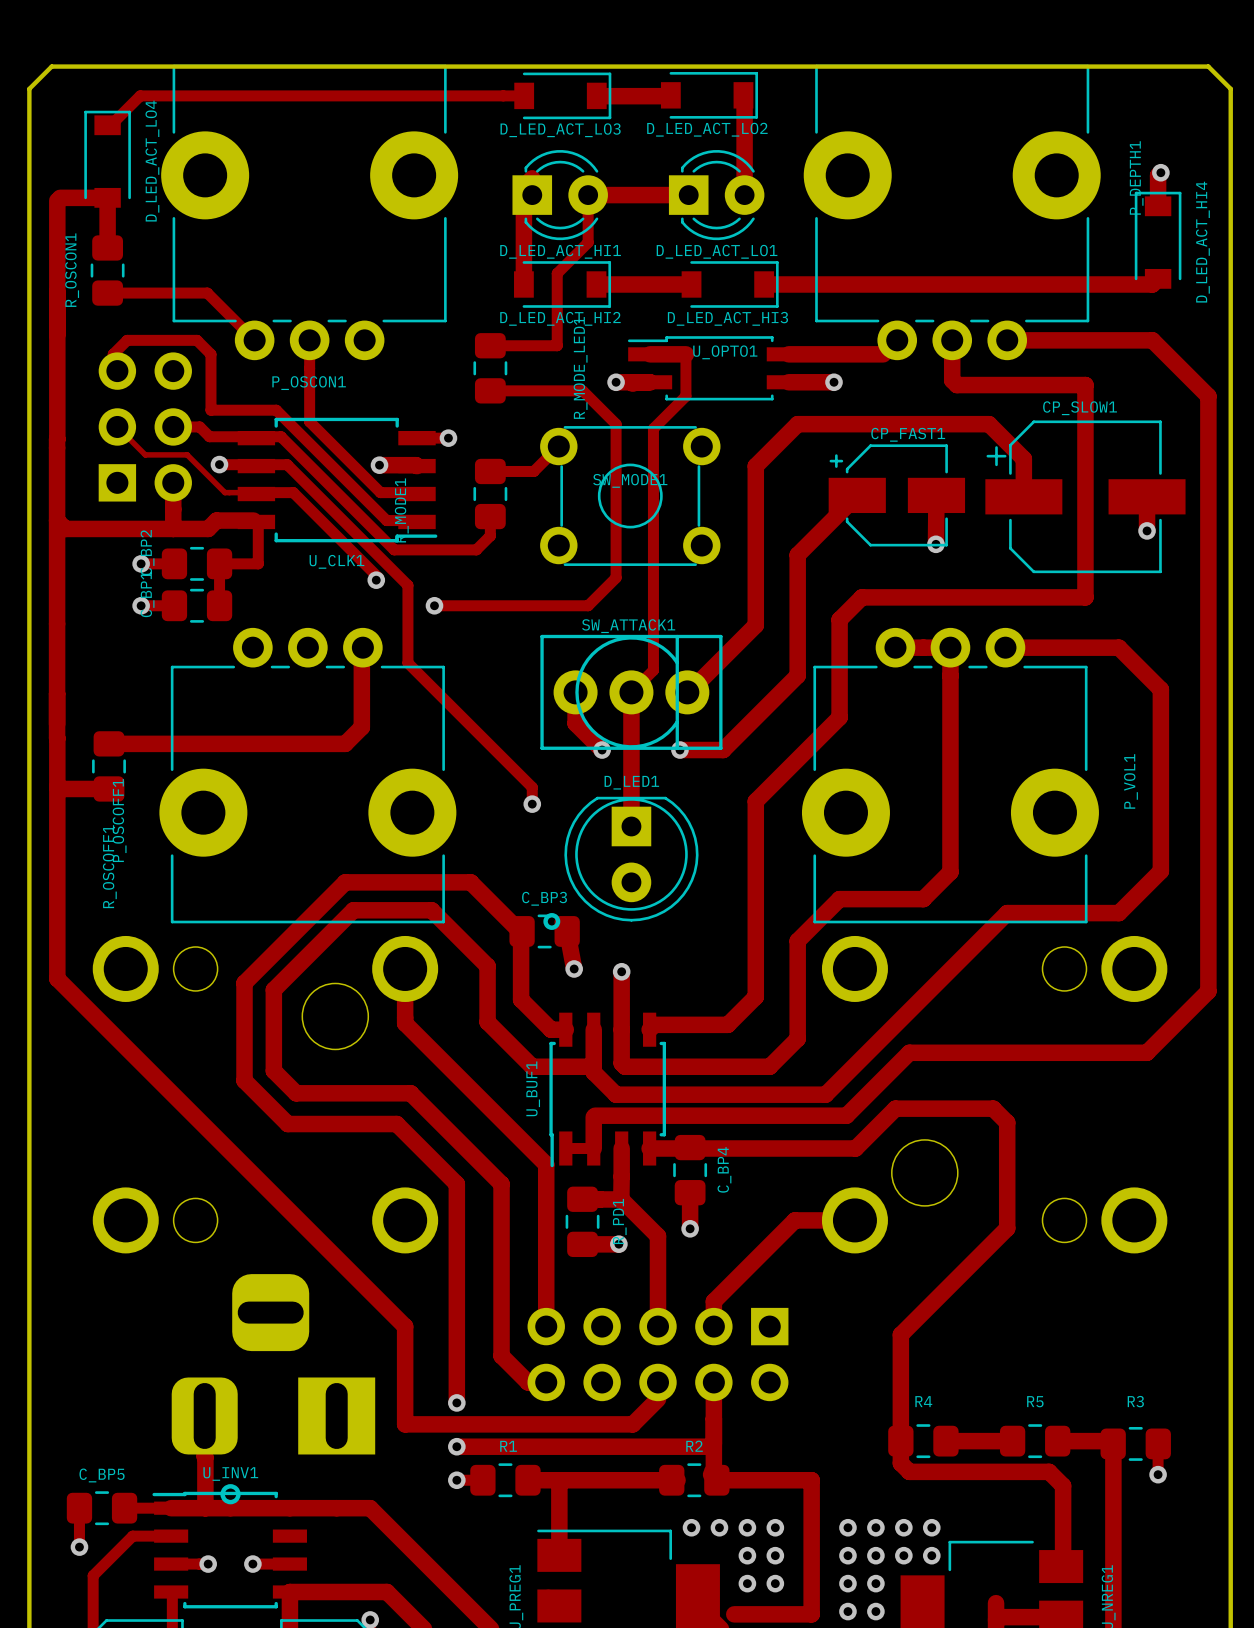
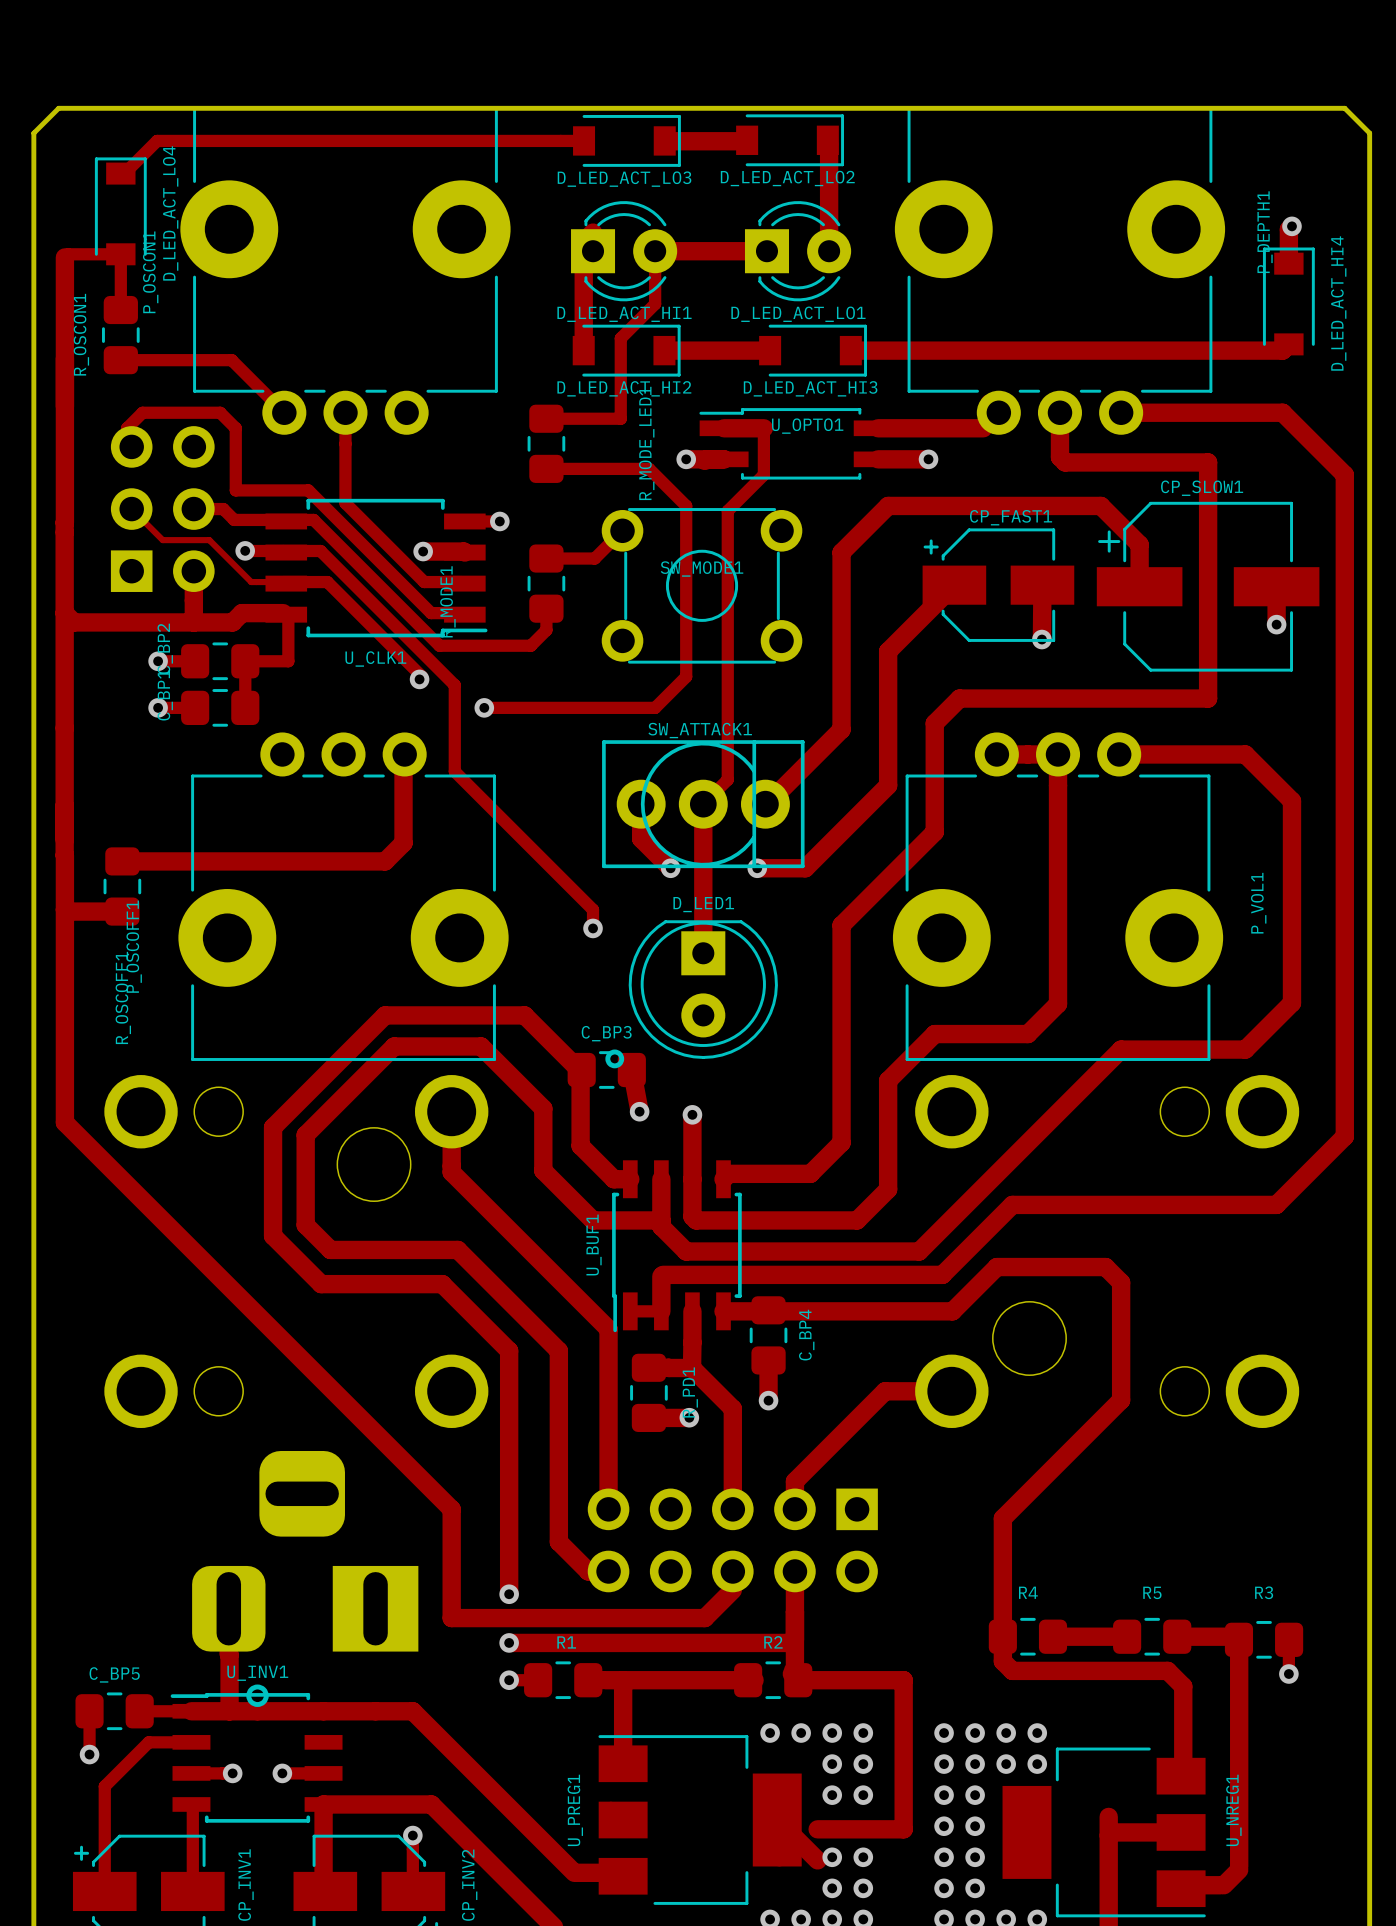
track width: thick (60, 197) (107, 197) (107, 247) -> thin (68, 254) (120, 254) (120, 310)
P_OSCON1 name rotation: 0° (309, 383) -> 90° counterclockwise (150, 272)
P_OSCON1 name position: P_OSCON1 (309, 383) -> P_OSCON1 (150, 272)

